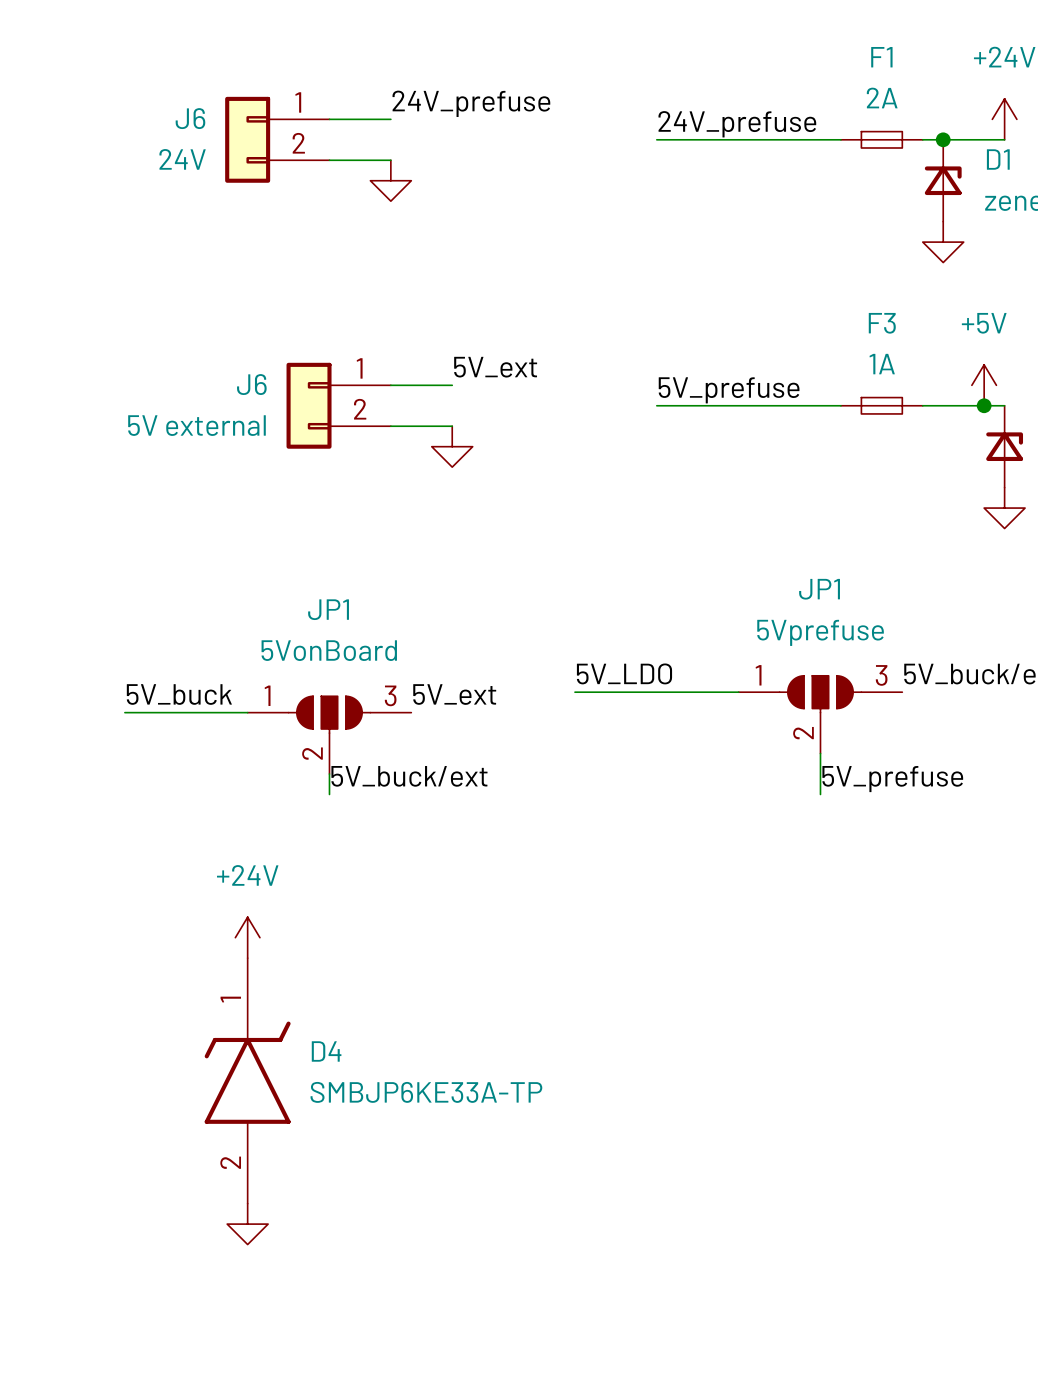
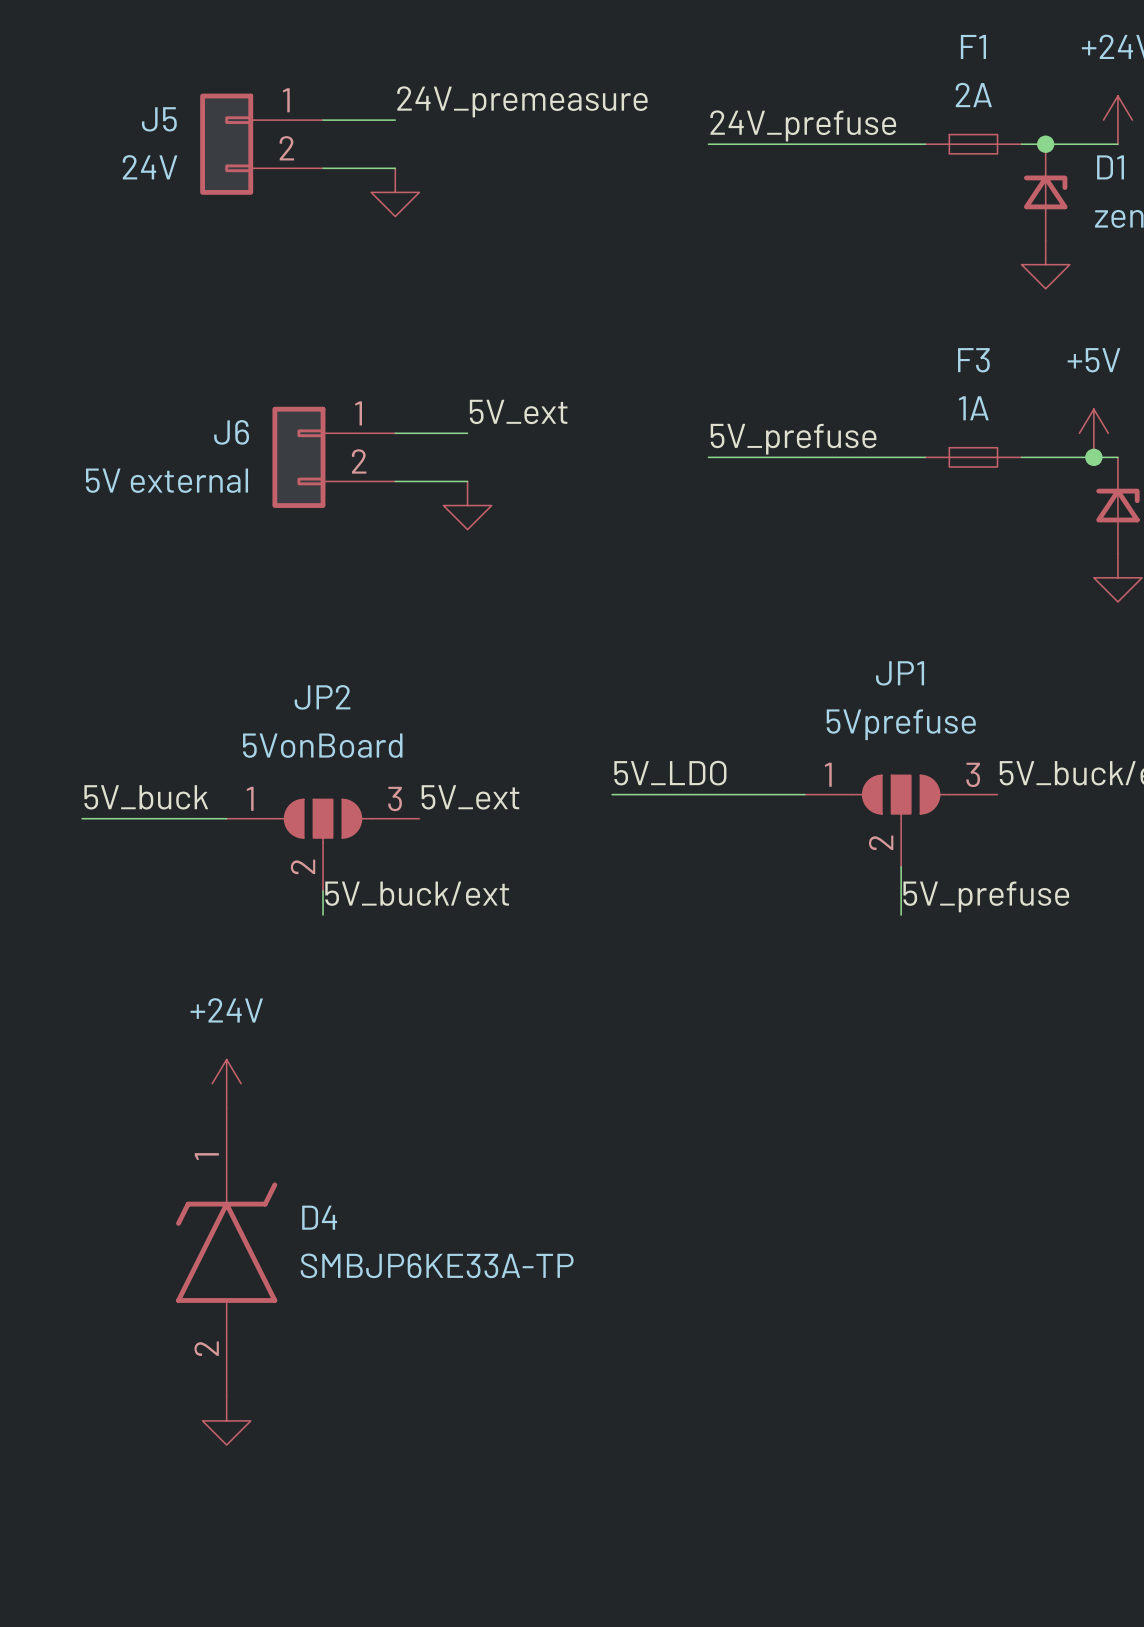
label: 24V_prefuse (471, 103) -> 24V_premeasure (522, 101)
J6 name: J6 (190, 118) -> J5 (159, 119)
JP1 name: JP1 (328, 609) -> JP2 (322, 697)

